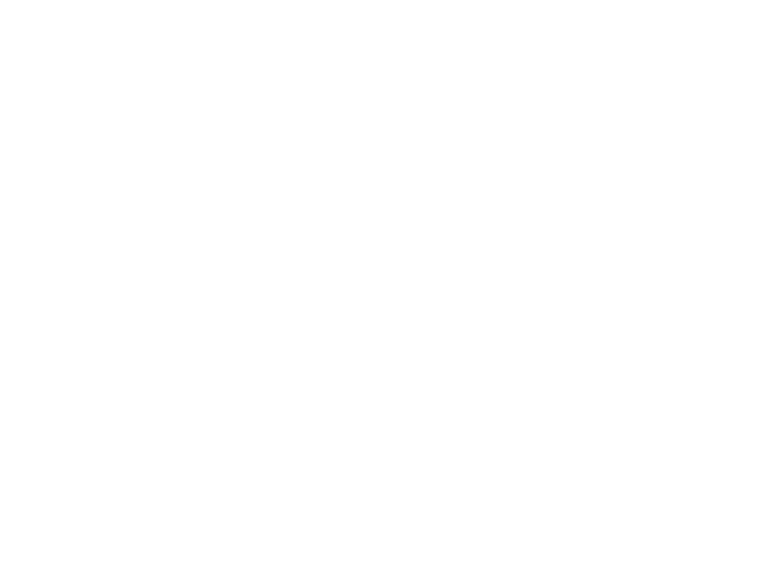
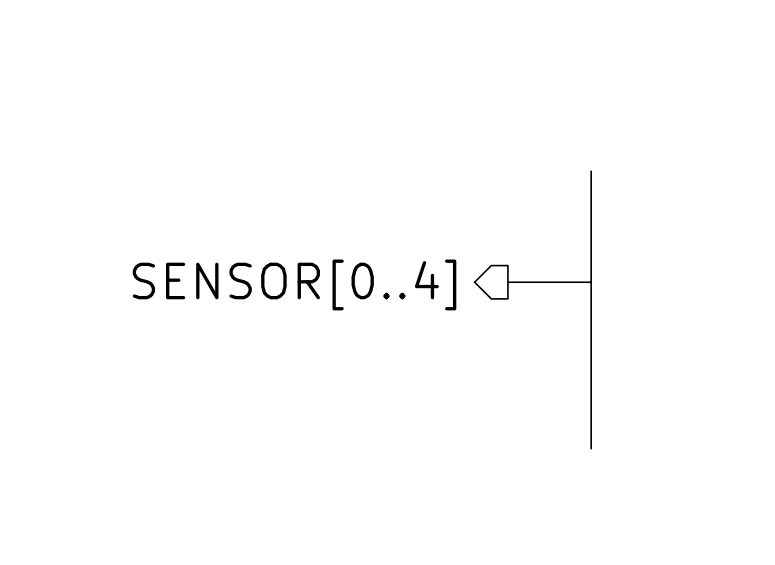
bus: none -> (591, 171) (591, 448)
bus: none -> (507, 282) (591, 282)
hierarchical label: none -> SENSOR[0..4] (294, 284)

